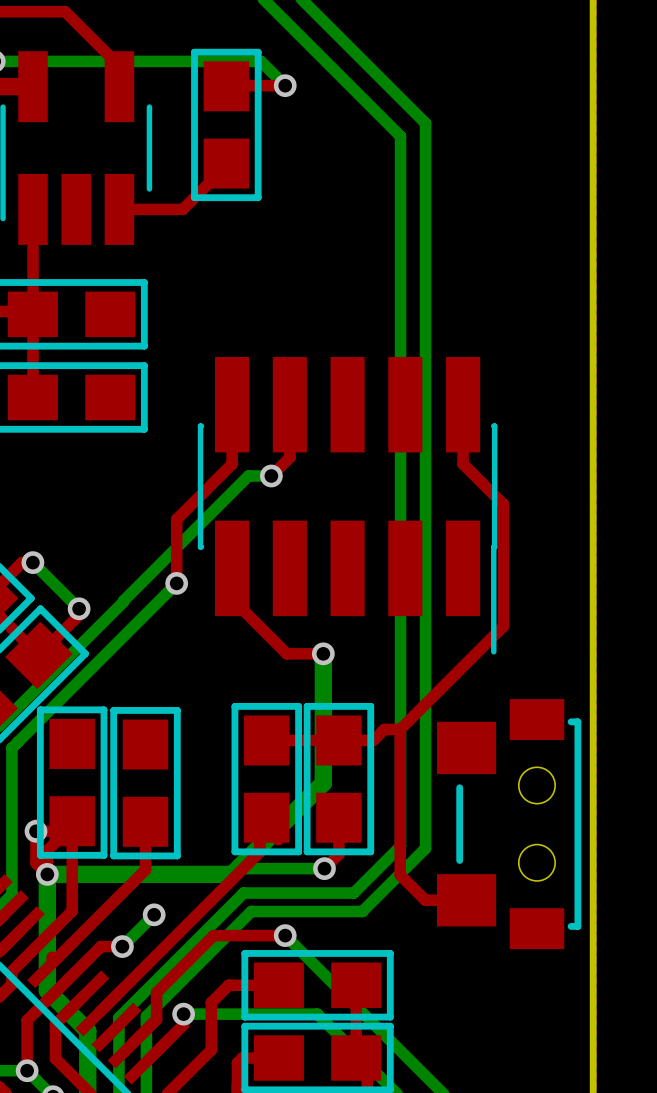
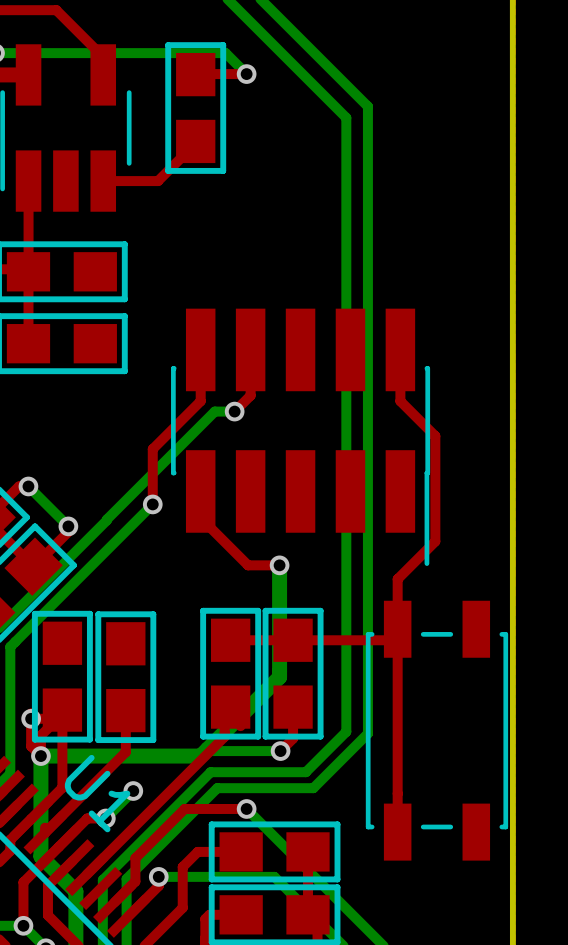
top track: (459, 669) (400, 729) -> (397, 579) (397, 832)
part footprint: [436, 699, 582, 950] -> [365, 600, 509, 861]
top track: (400, 729) (384, 729) (373, 740) -> (397, 629) (386, 640) (322, 640)
top track: (400, 729) (400, 875) (425, 900) (466, 900) -> none
U1 name: none -> U1 (97, 793)

